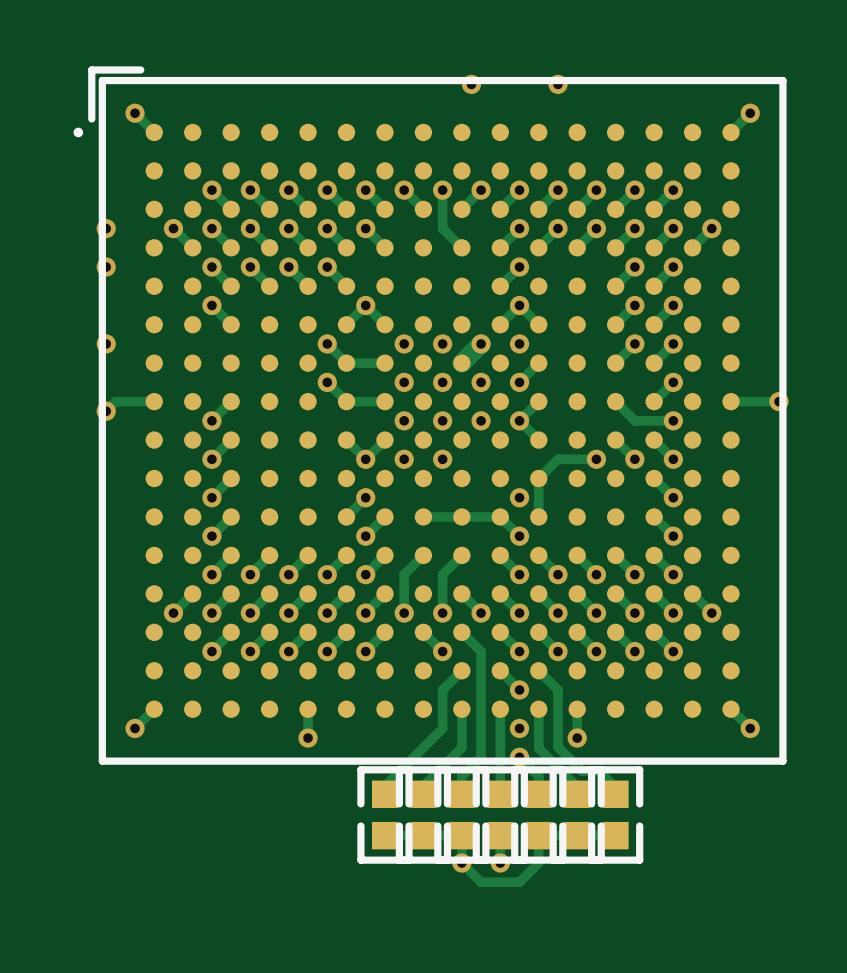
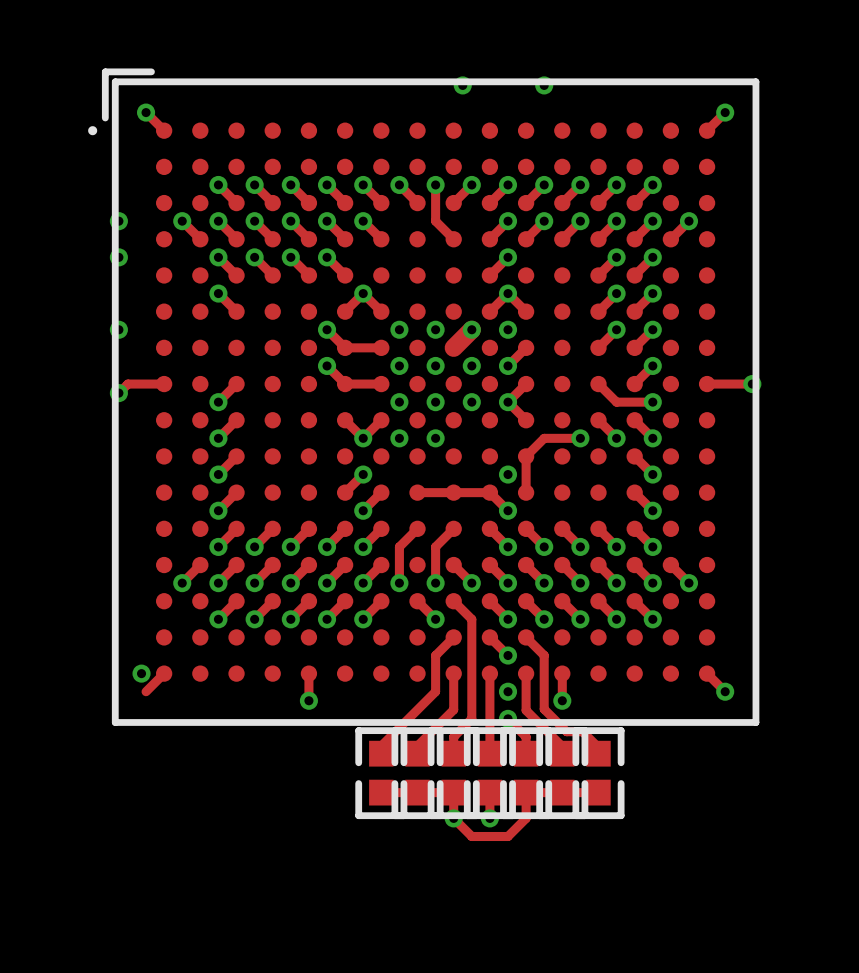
via position: (135, 728) -> (141, 673)

